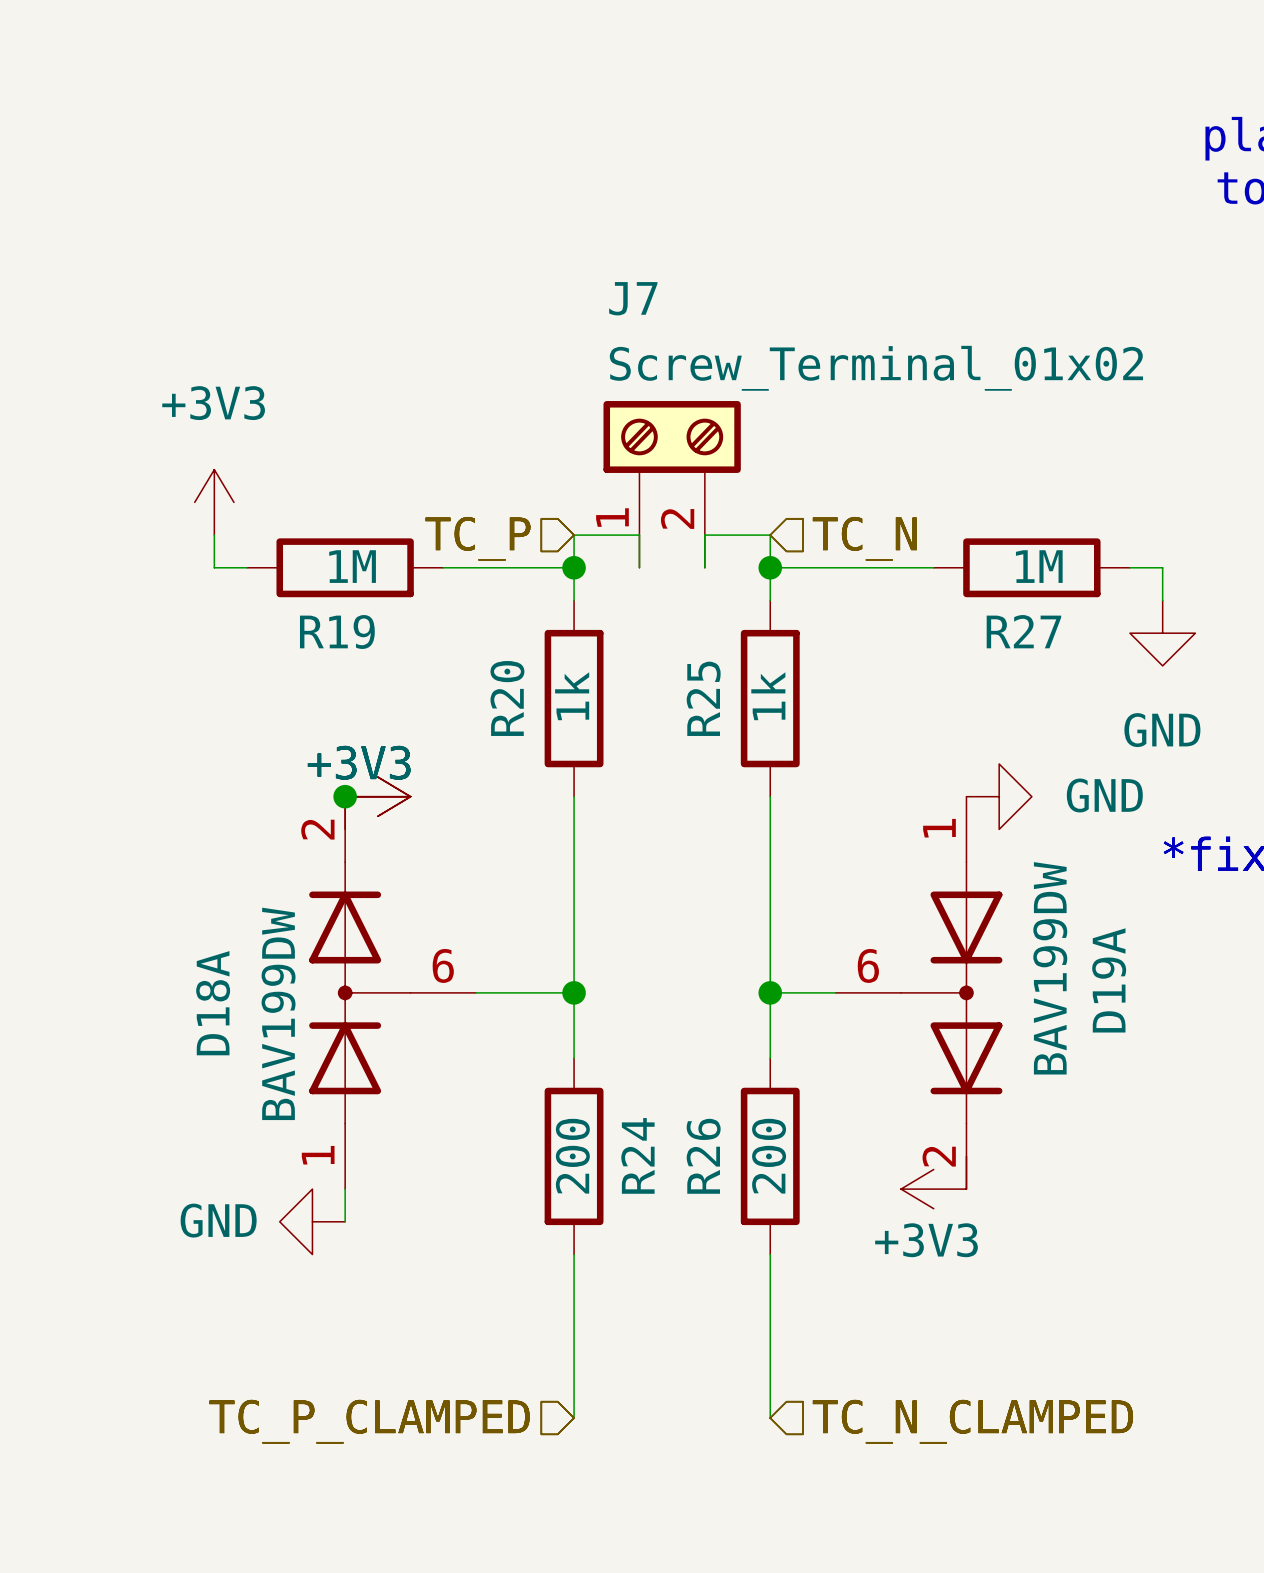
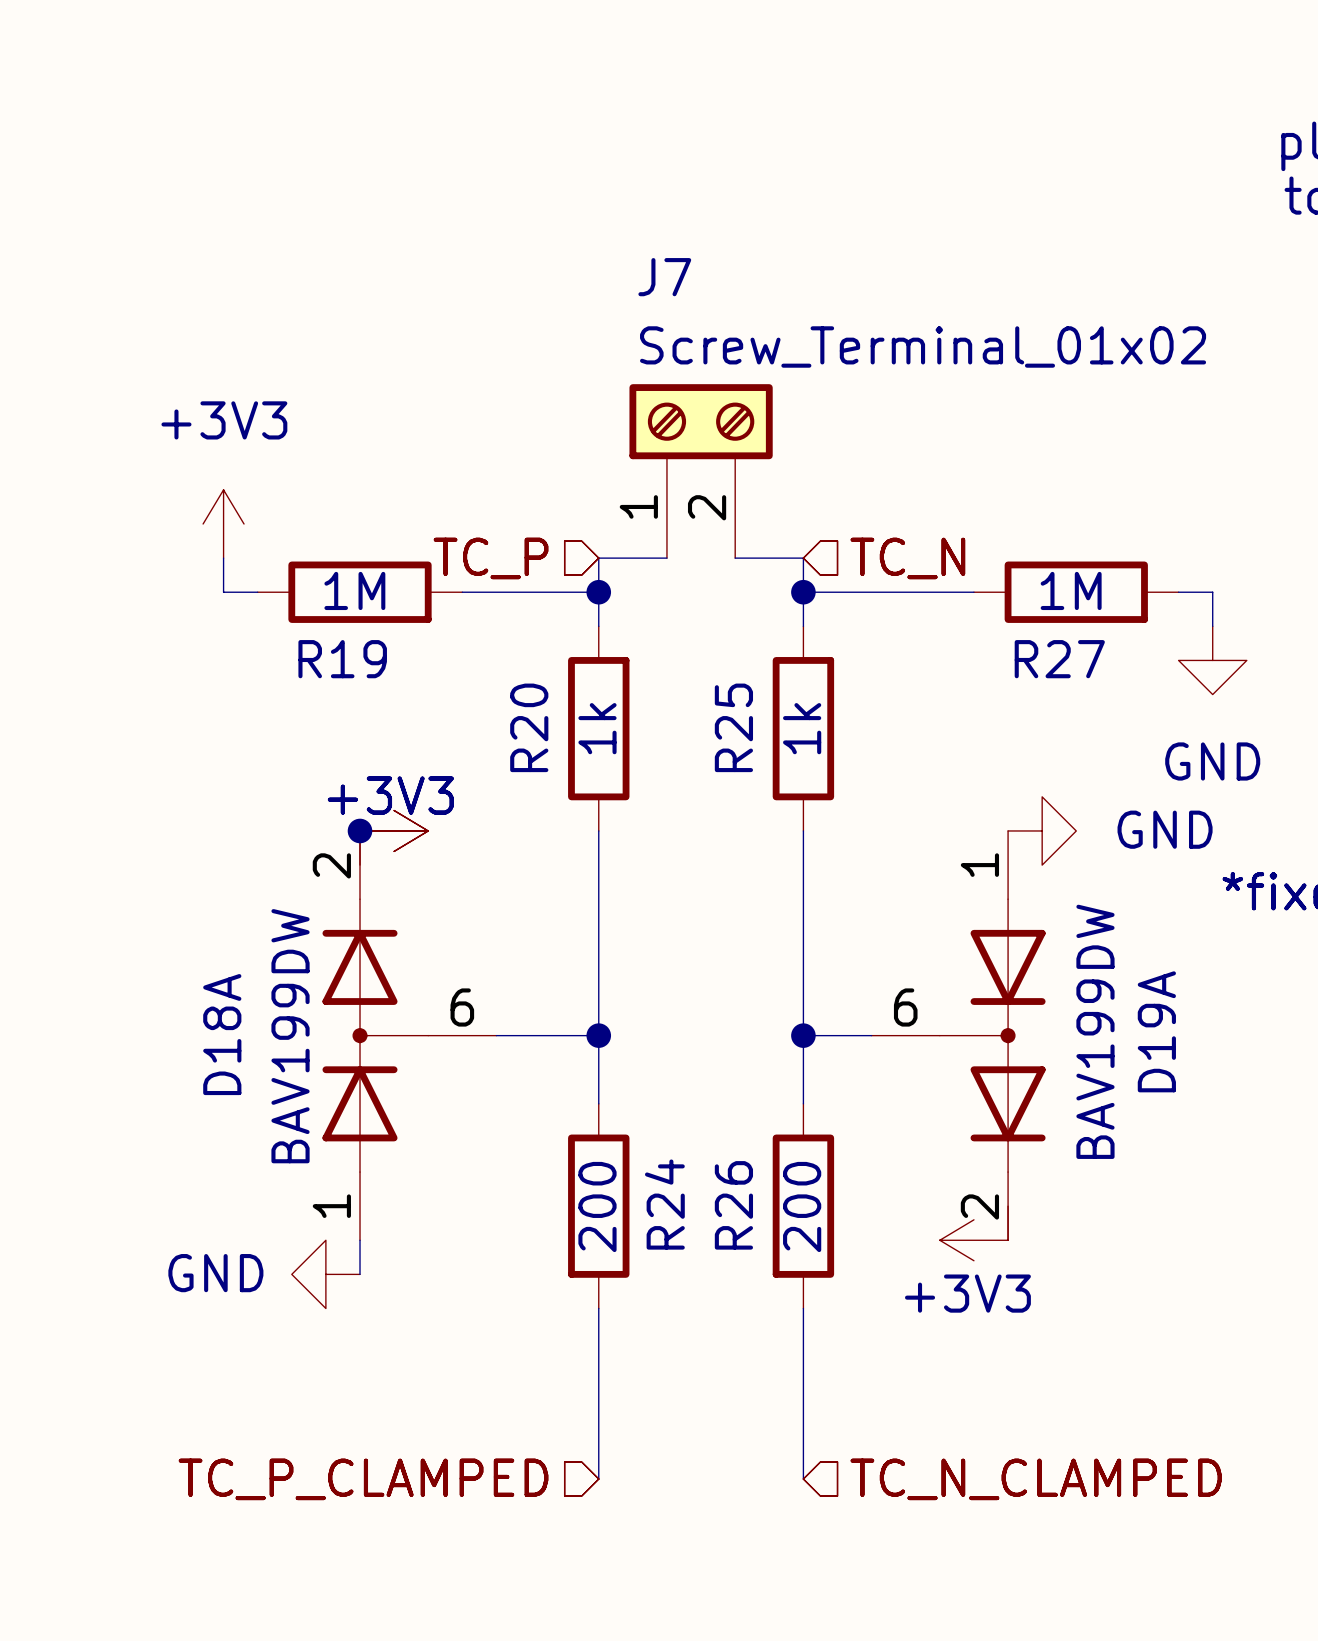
J7 position: (672, 484) -> (701, 471)
wire: (639, 535) (639, 567) -> none
wire: (704, 535) (704, 567) -> none

